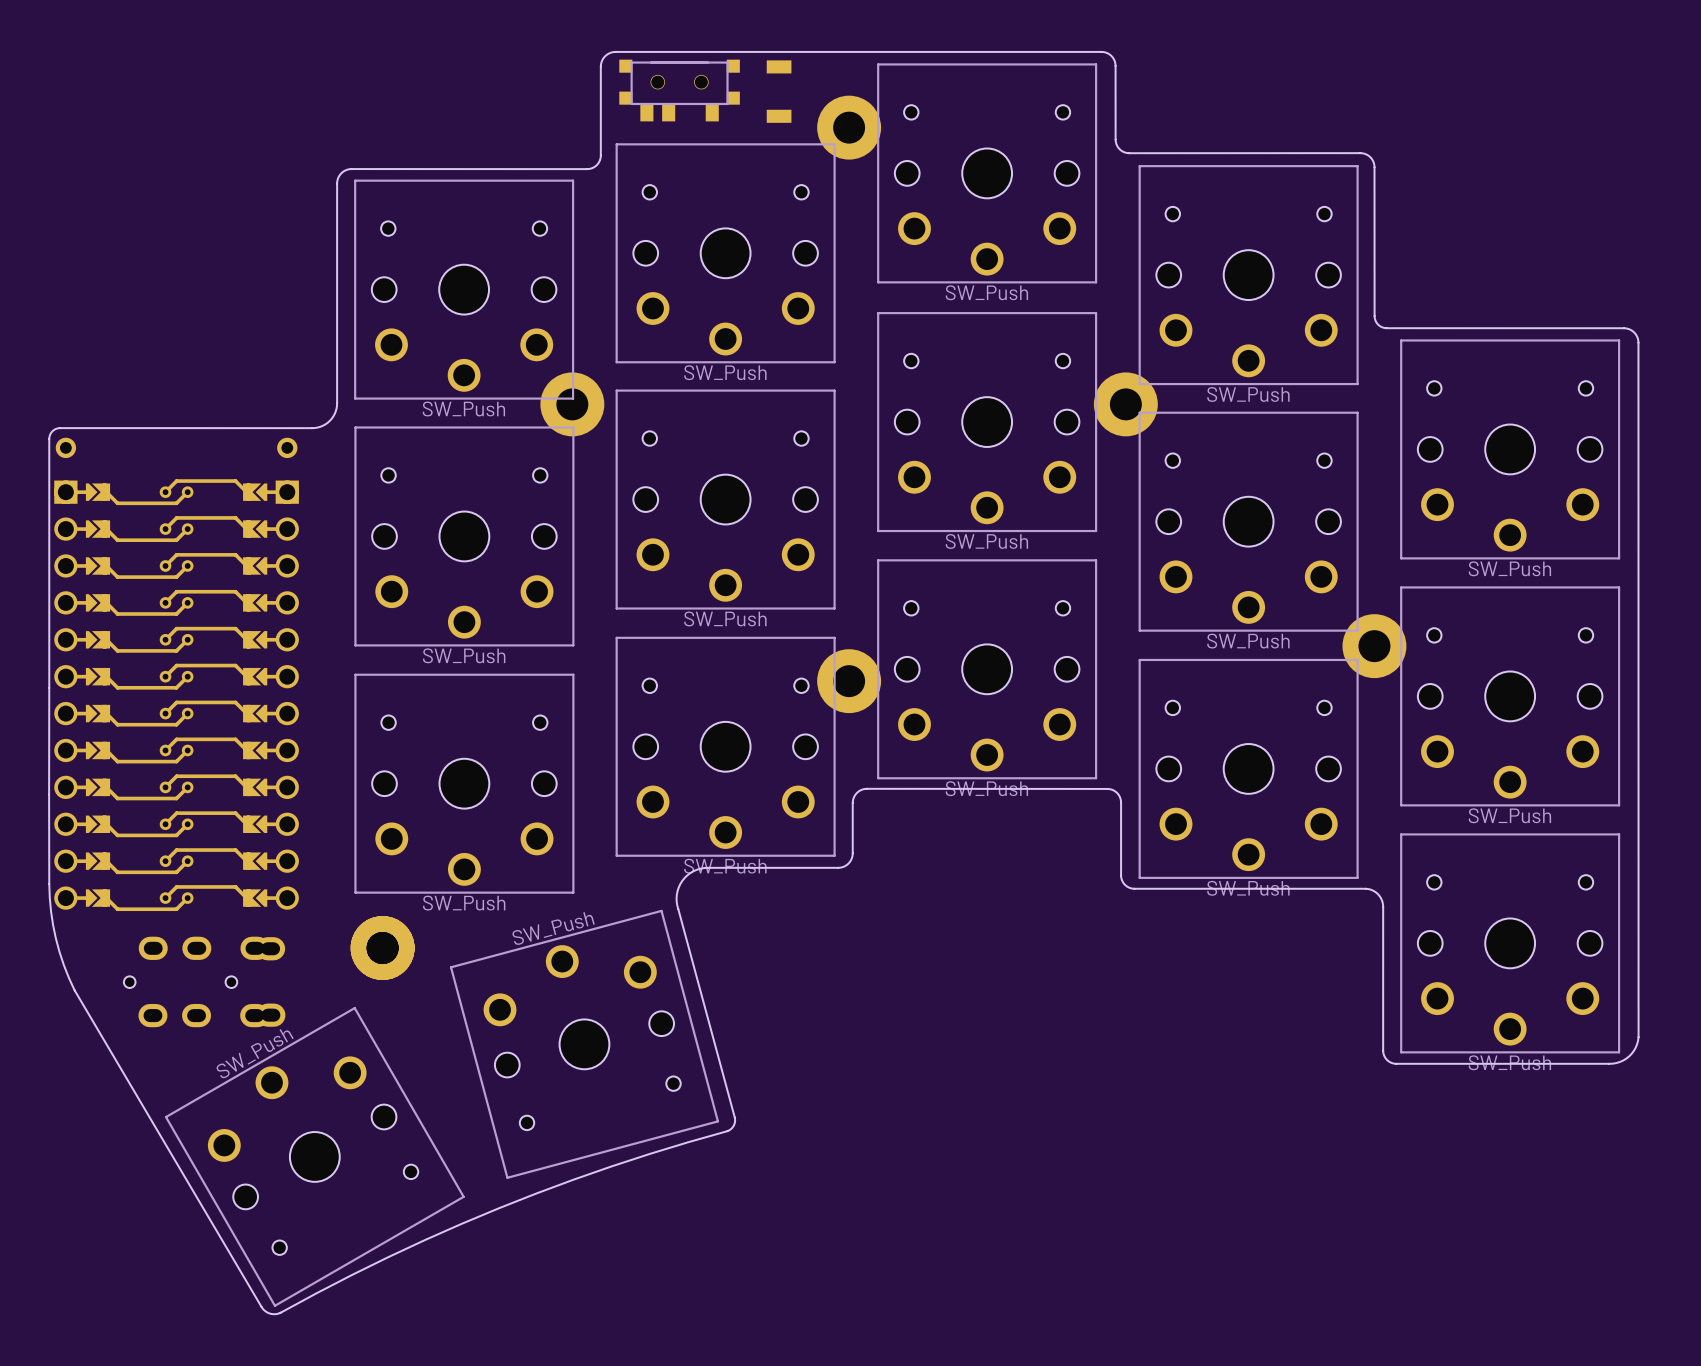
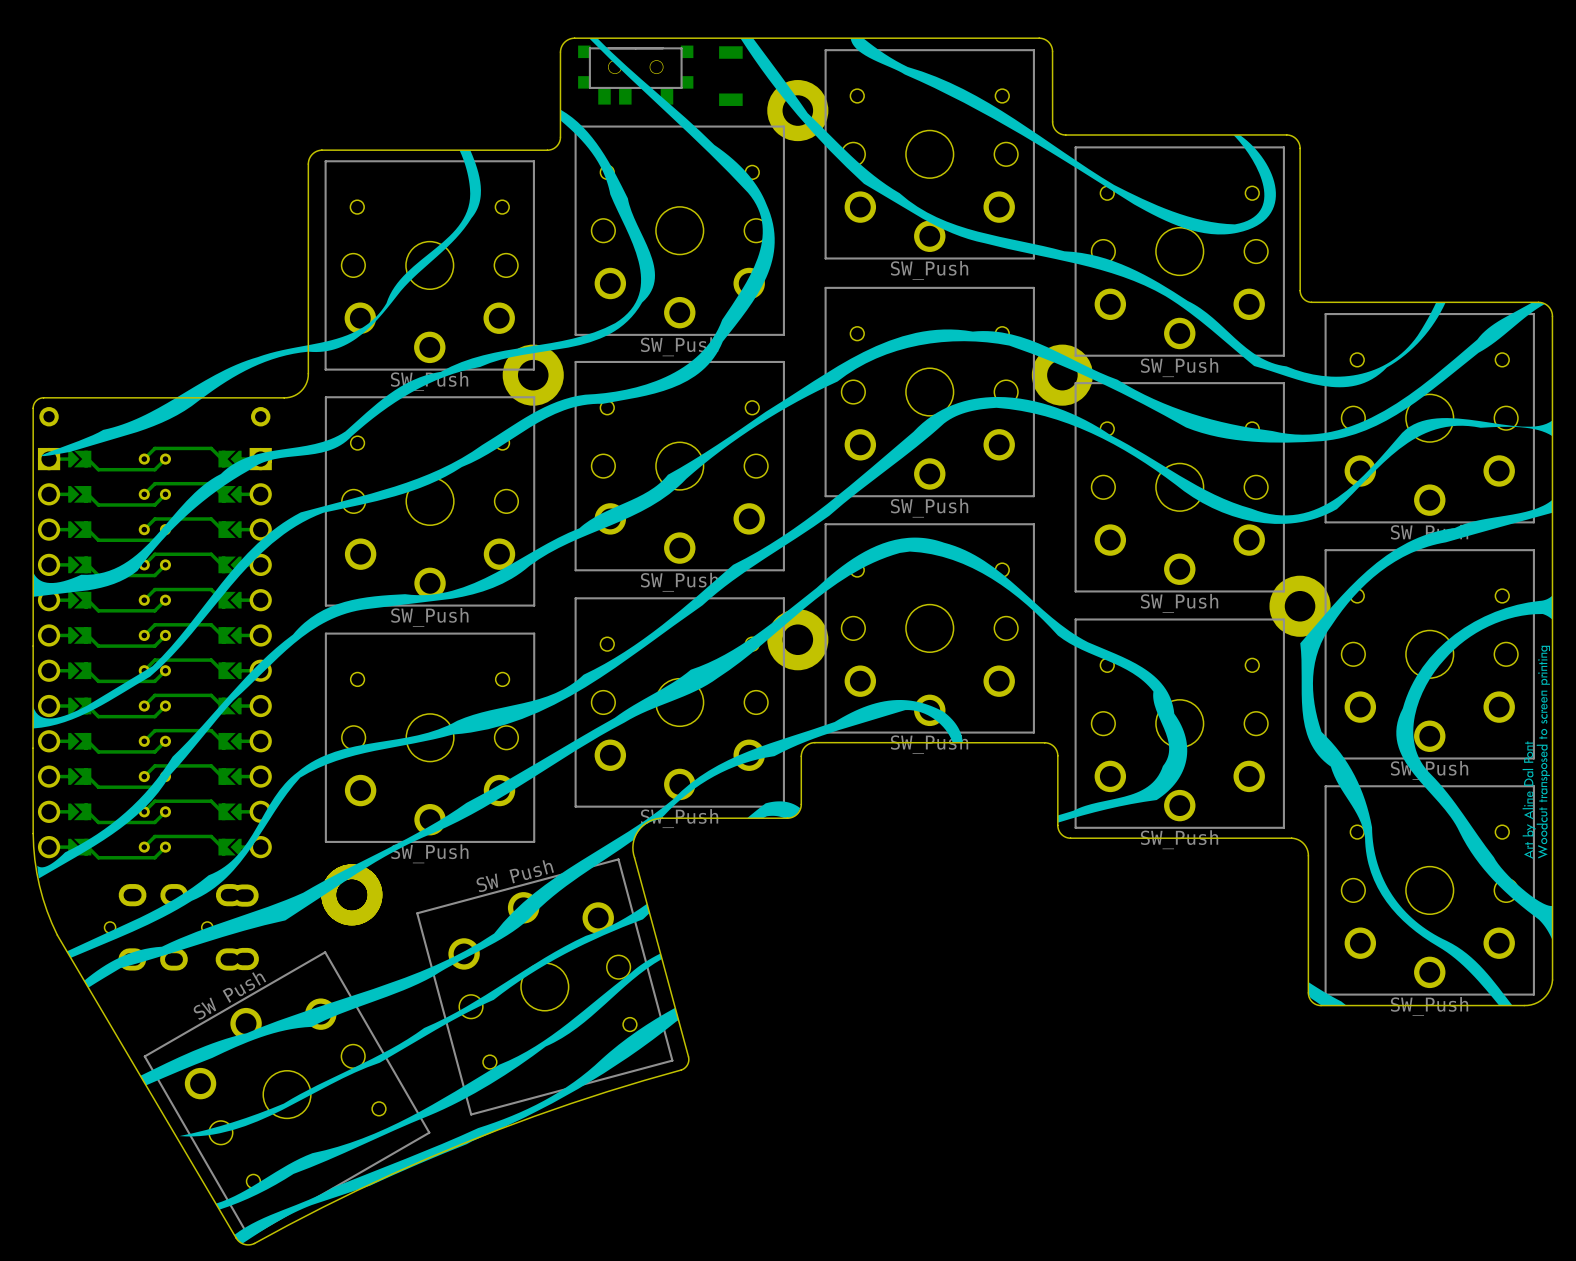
drawing: none -> [33, 38, 1553, 1244]

